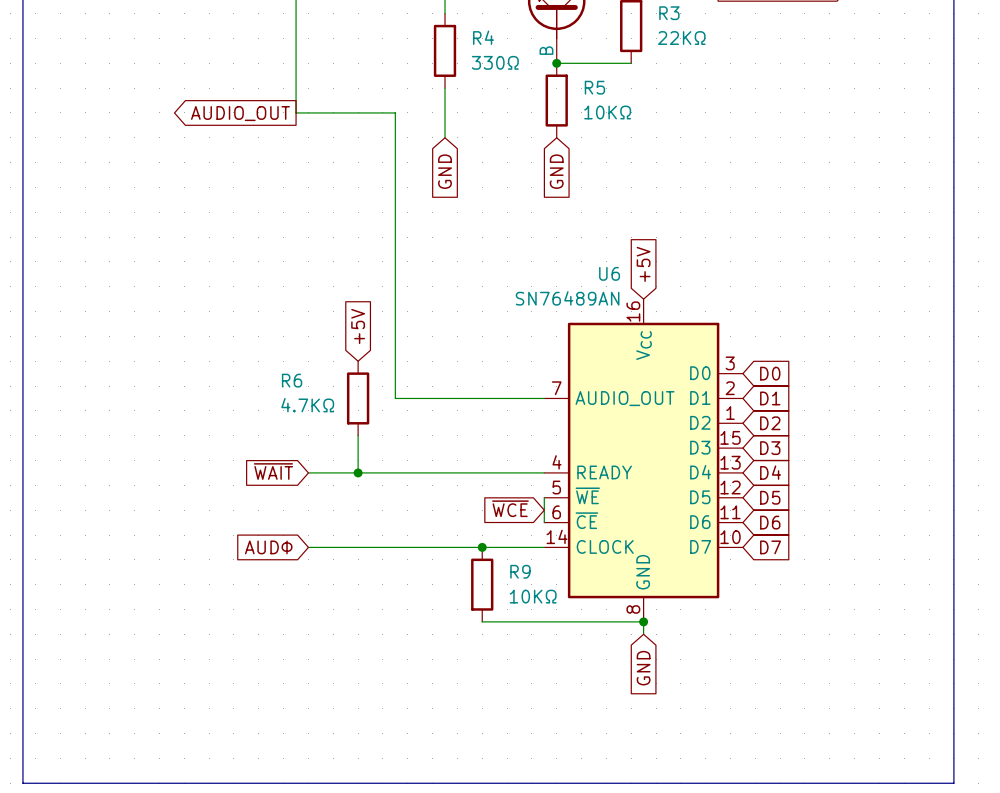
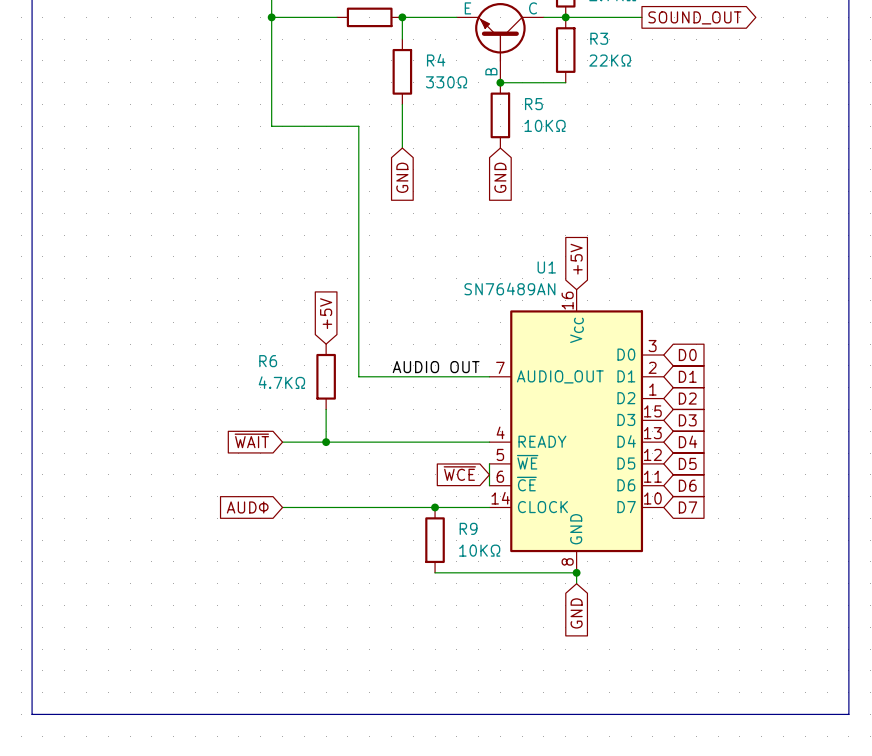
global label: AUDIO_OUT (240, 113) -> none
U6 name: U6 (609, 273) -> U1 (546, 267)
label: none -> AUDIO OUT (436, 367)

